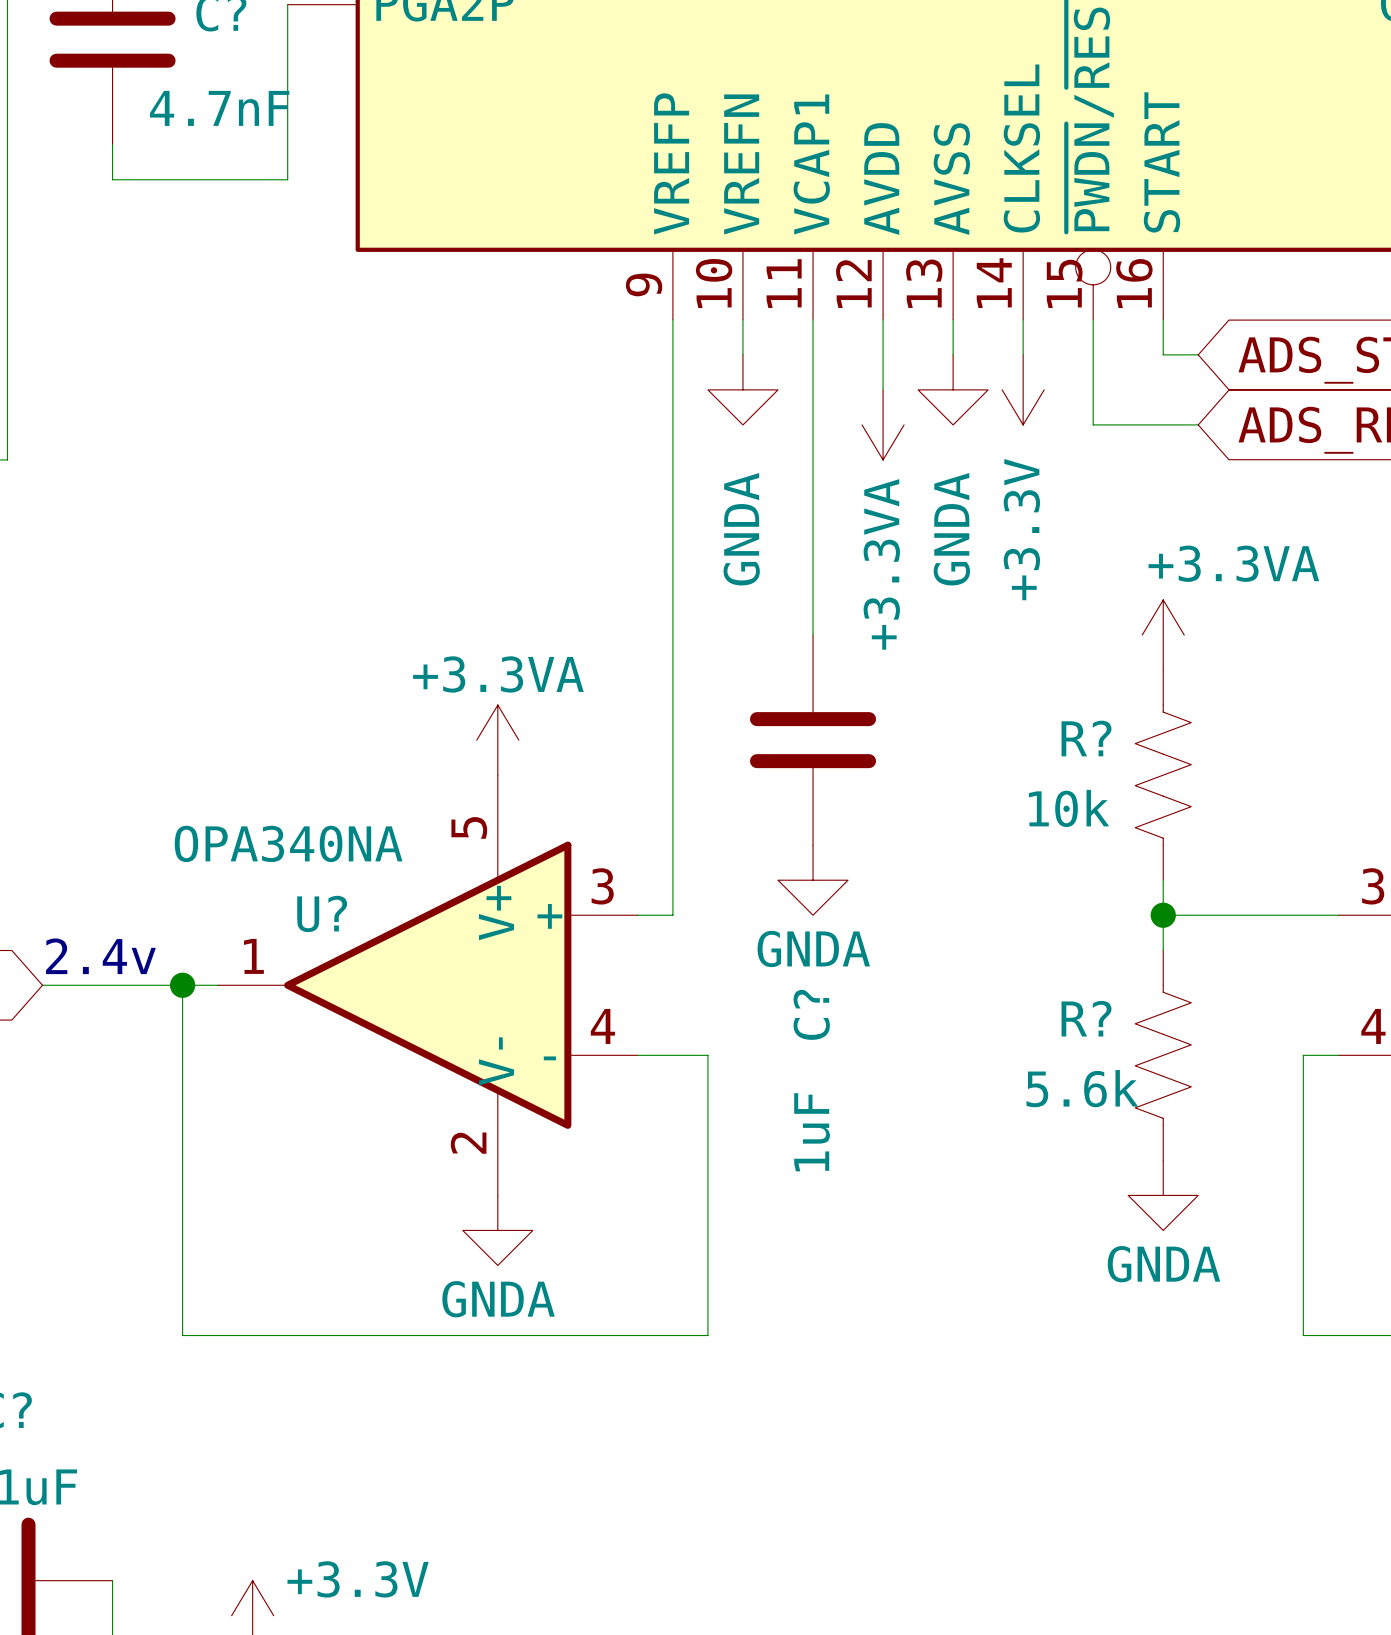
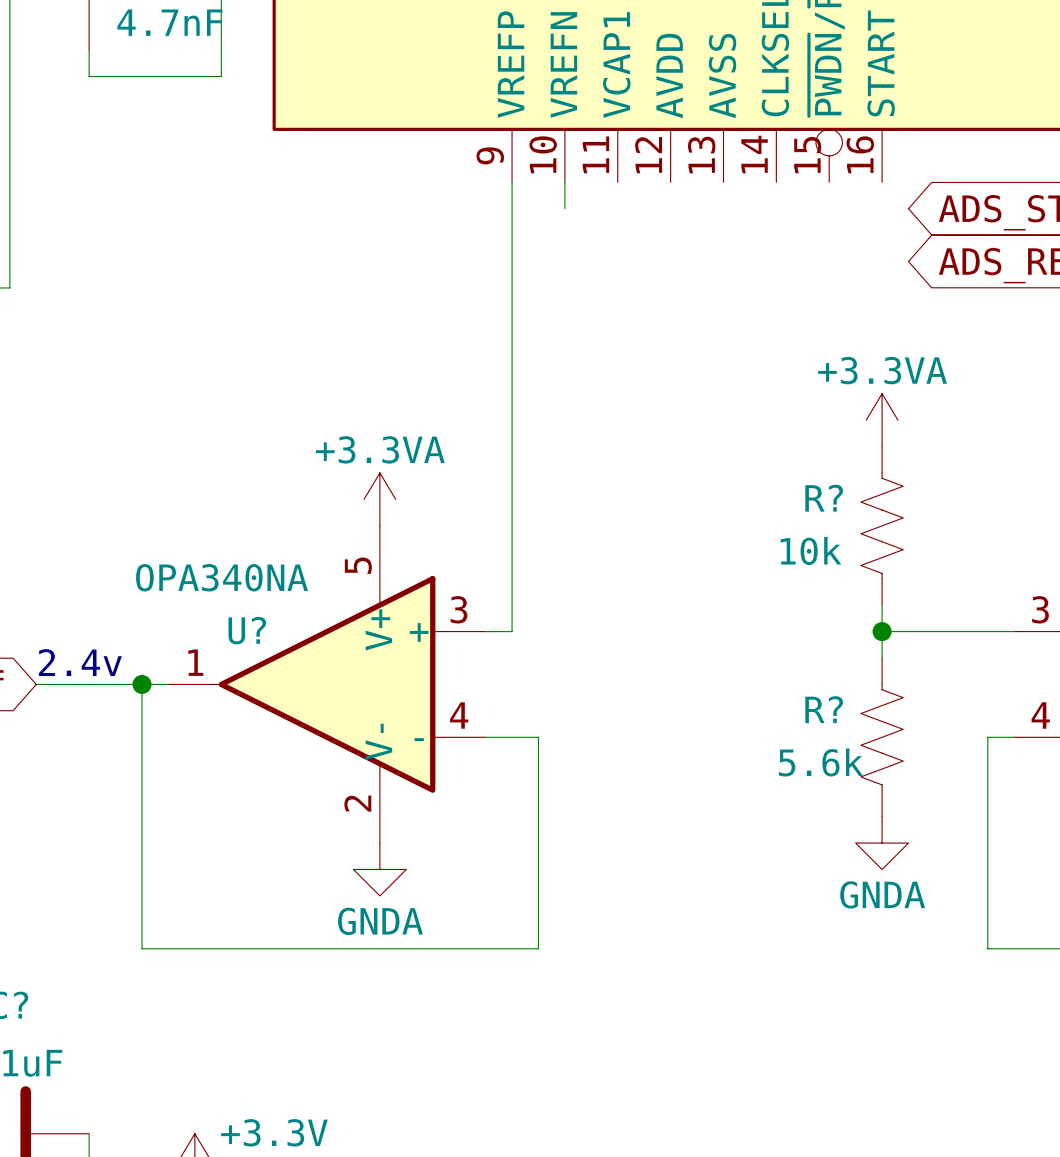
wire: (813, 319) (813, 635) -> none
wire: (883, 319) (883, 389) -> none
wire: (953, 319) (953, 354) -> none
wire: (1023, 319) (1023, 354) -> none
wire: (1093, 319) (1093, 424) (1198, 424) -> none
wire: (1163, 319) (1163, 354) (1198, 354) -> none
power symbol: GNDA (742, 389) -> none
power symbol: GNDA (953, 389) -> none
power symbol: +3.3V (1023, 389) -> none
power symbol: +3.3VA (883, 424) -> none
power symbol text position: +3.3VA (1233, 563) -> +3.3VA (882, 370)
C?: 1uF (813, 740) -> none
power symbol: GNDA (813, 880) -> none

